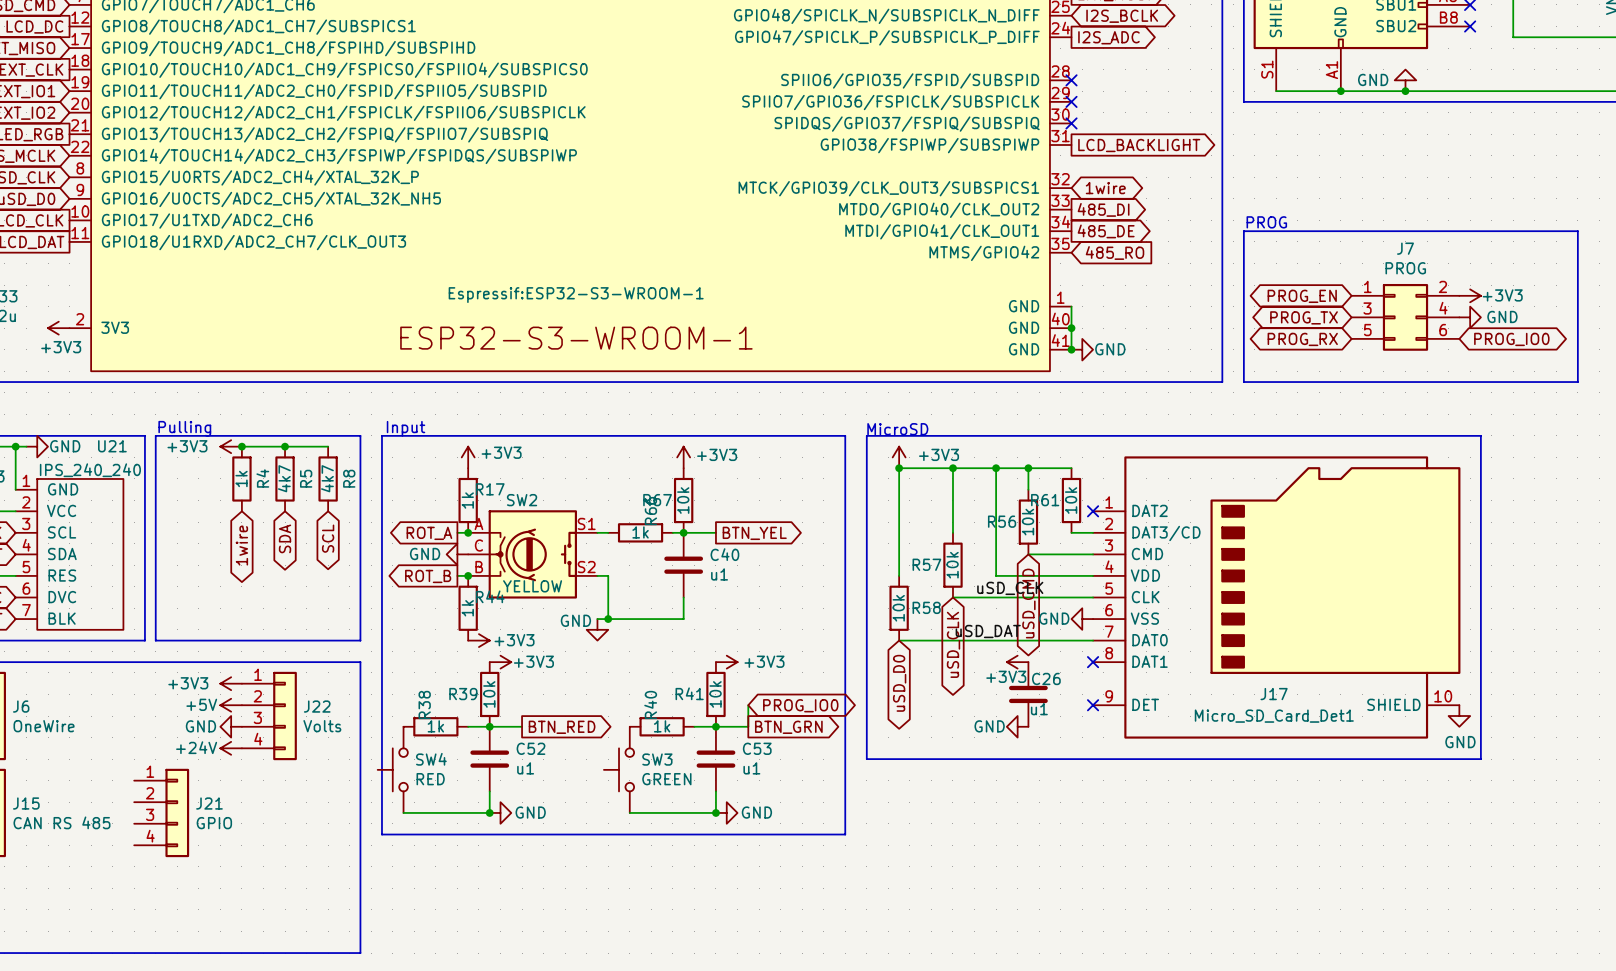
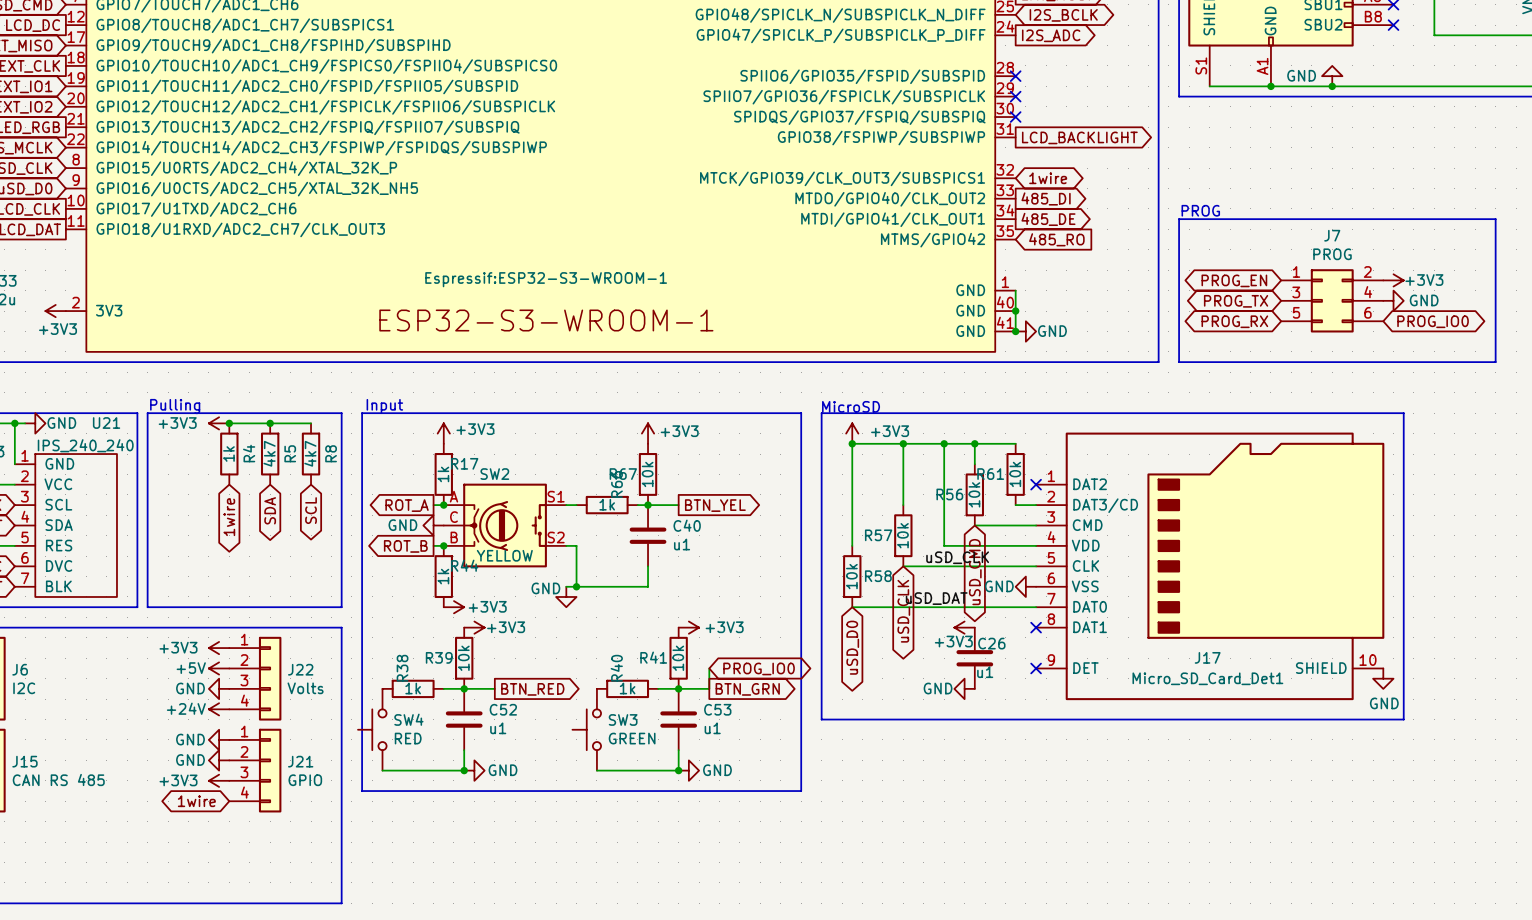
J6 value: OneWire (44, 726) -> I2C (24, 688)
power symbol: none -> GND (219, 739)
power symbol: none -> GND (219, 760)
J21 position: (161, 812) -> (255, 770)
power symbol: none -> +3V3 (219, 780)
global label: none -> 1wire (196, 801)

